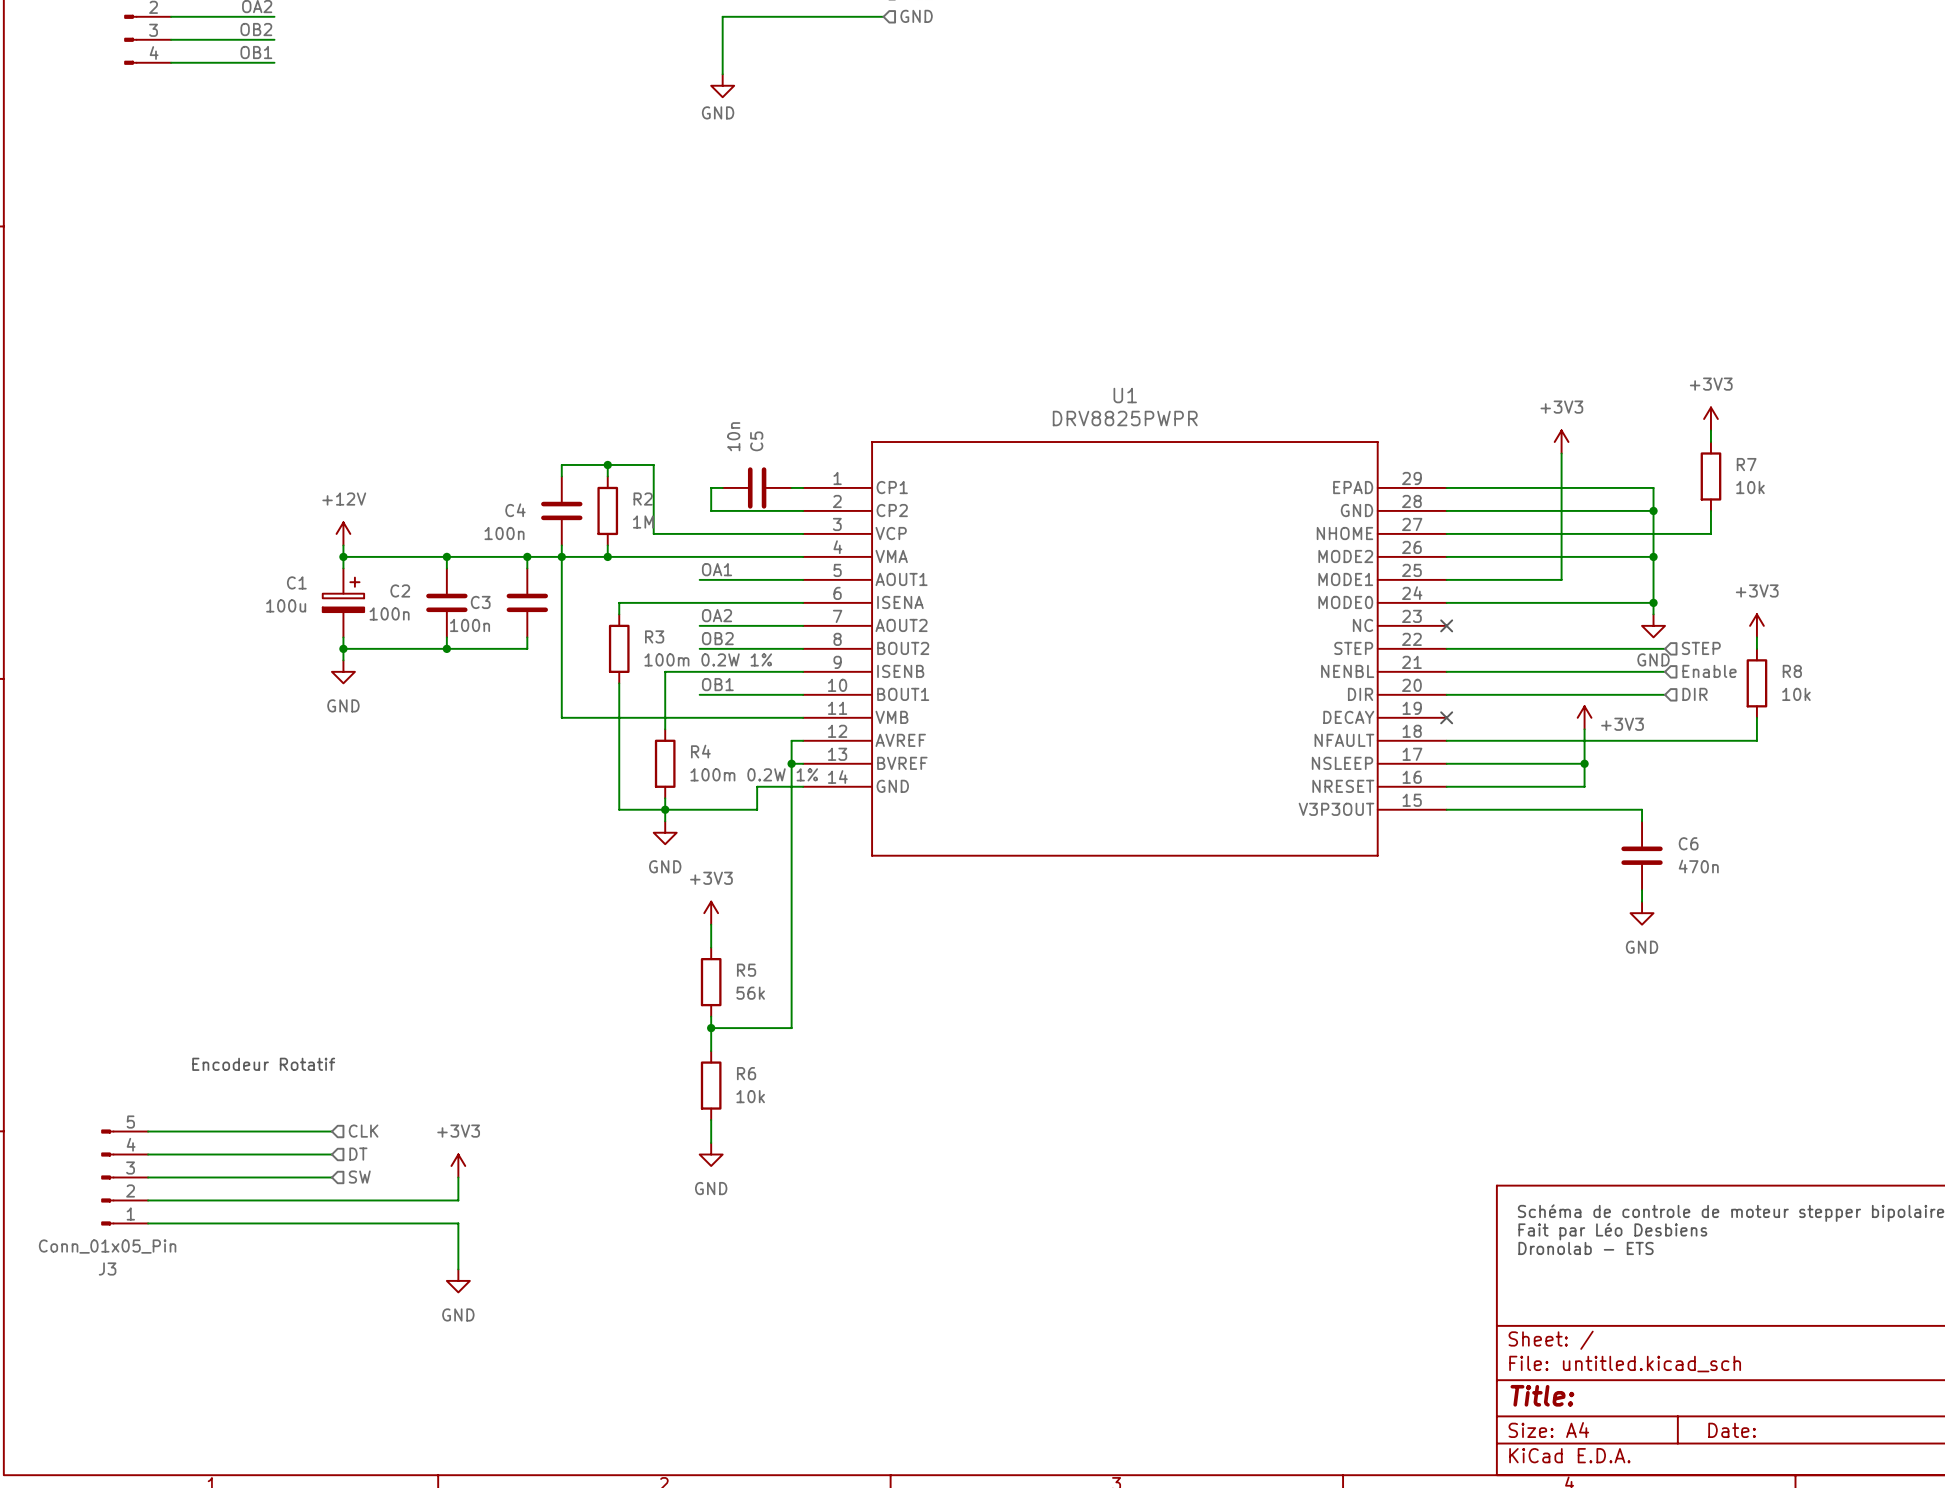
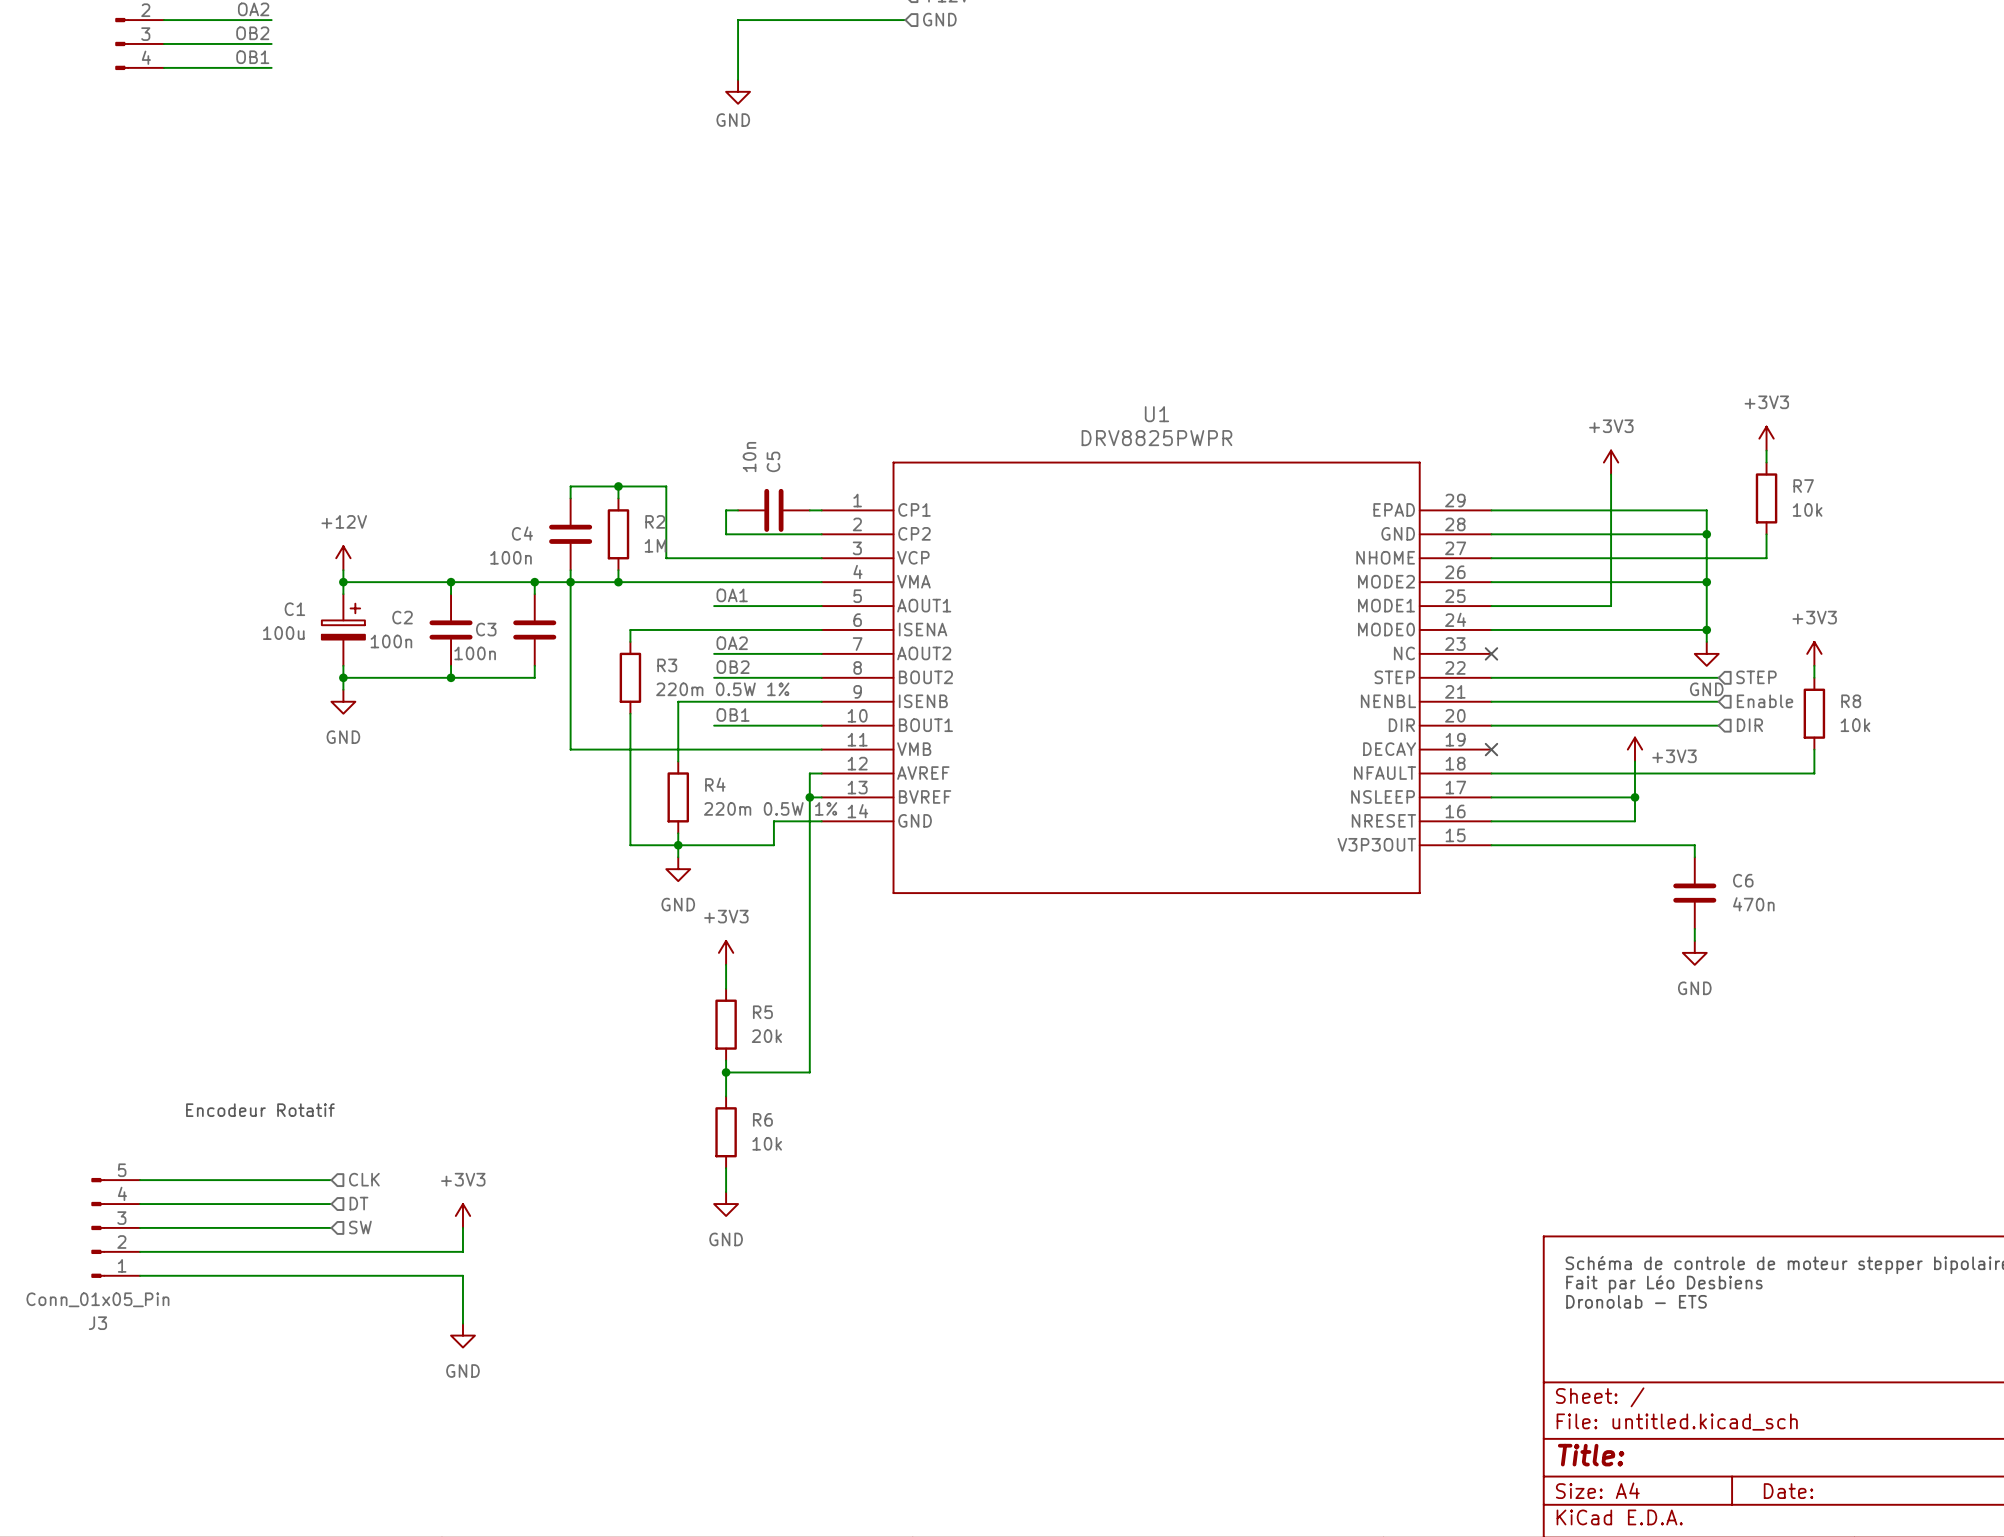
R3 value: 100m 0.2W 1% (708, 659) -> 220m 0.5W 1% (722, 689)
R4 value: 100m 0.2W 1% (754, 774) -> 220m 0.5W 1% (770, 808)
R5 value: 56k (750, 993) -> 20k (766, 1036)

